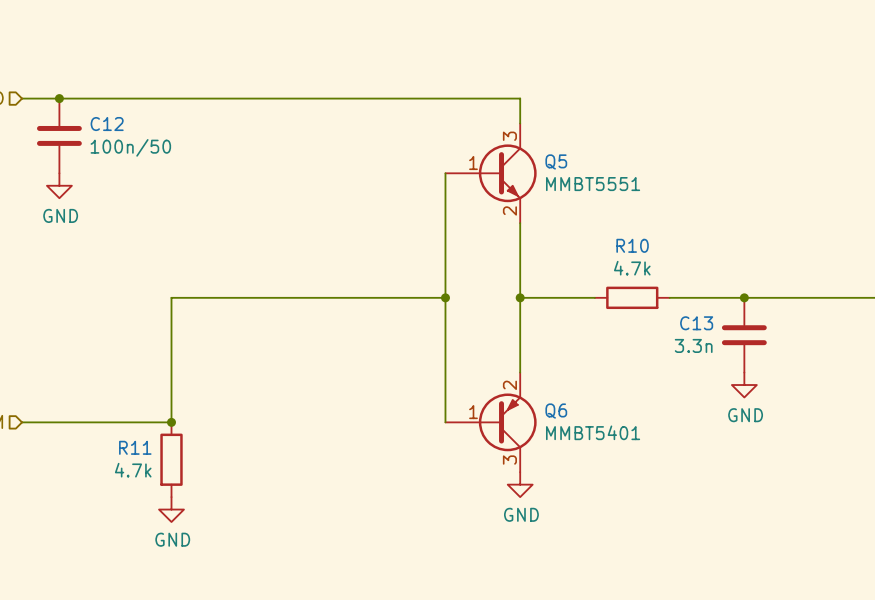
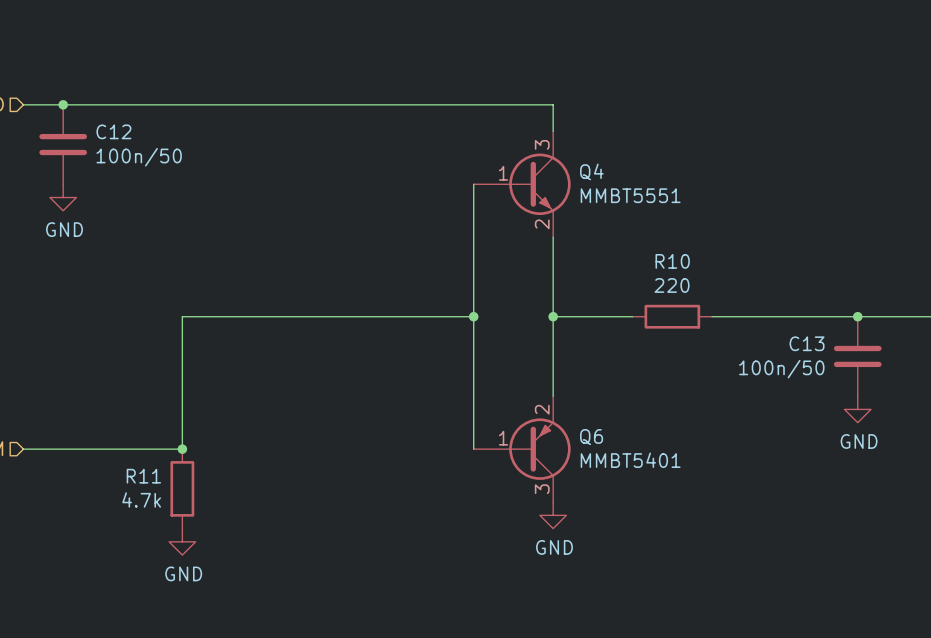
Q5 name: Q5 (556, 161) -> Q4 (591, 171)
R10 value: 4.7k (632, 268) -> 220 (672, 285)
junction: (744, 297) -> none
junction: none -> (857, 316)
C13 position: (744, 335) -> (857, 356)
C13 value: 3.3n (693, 345) -> 100n/50 (781, 369)
power symbol position: GND (744, 385) -> GND (857, 409)

